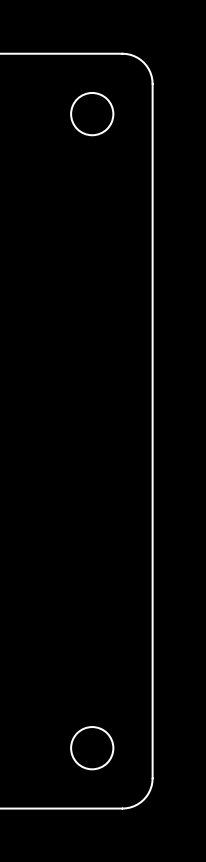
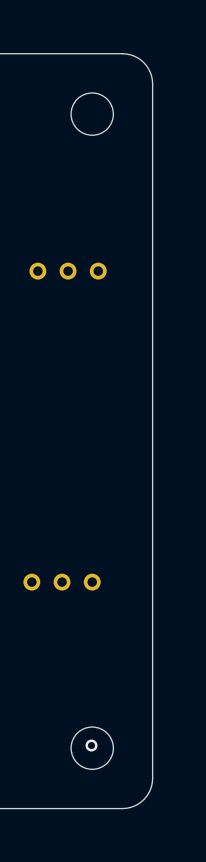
part: none -> (68, 271)
part: none -> (62, 582)
via: none -> (91, 745)

